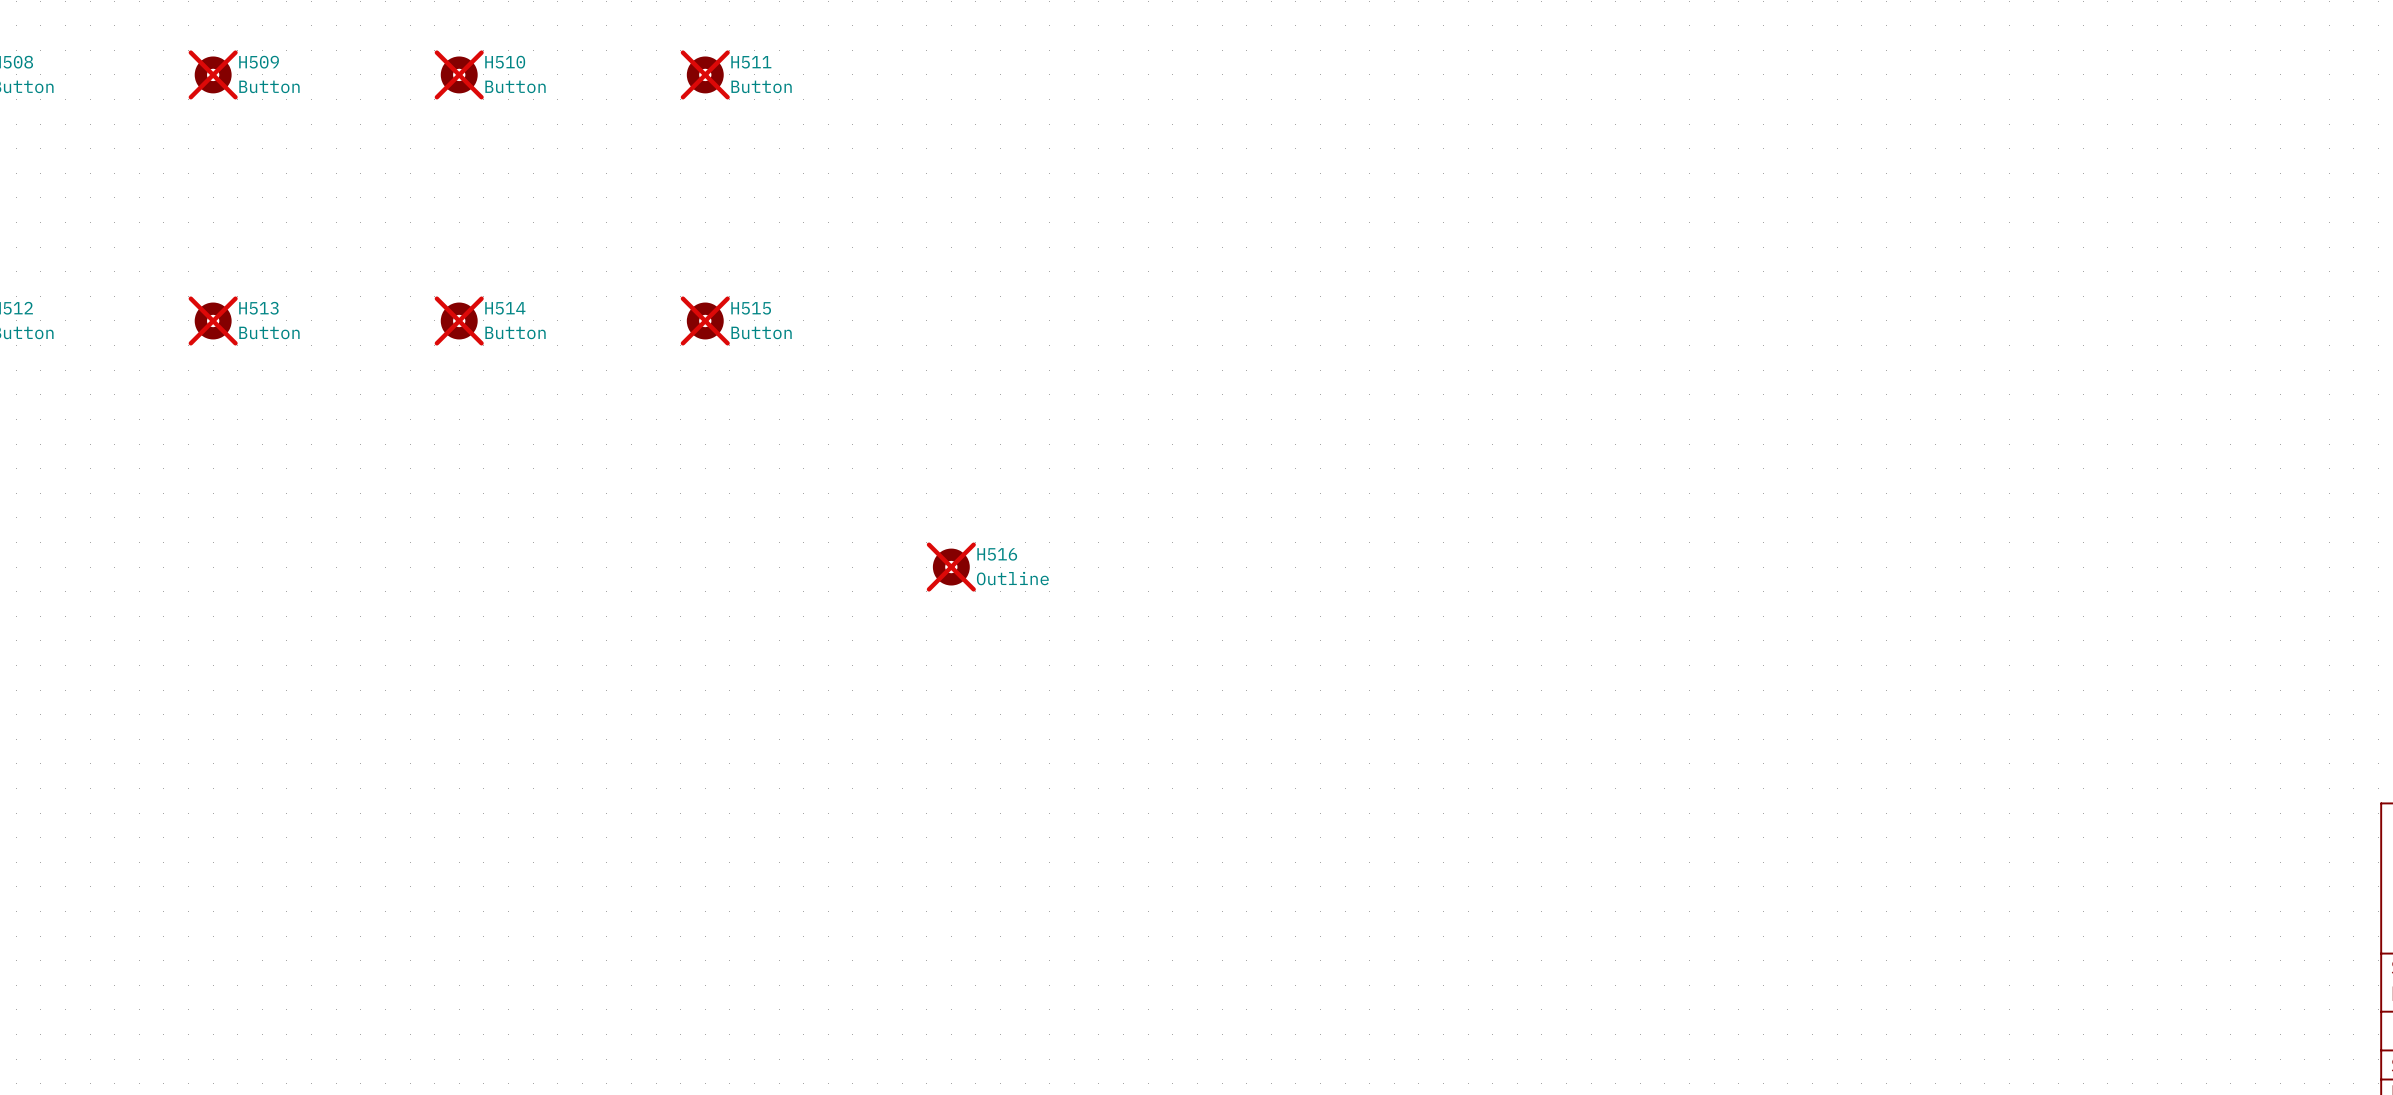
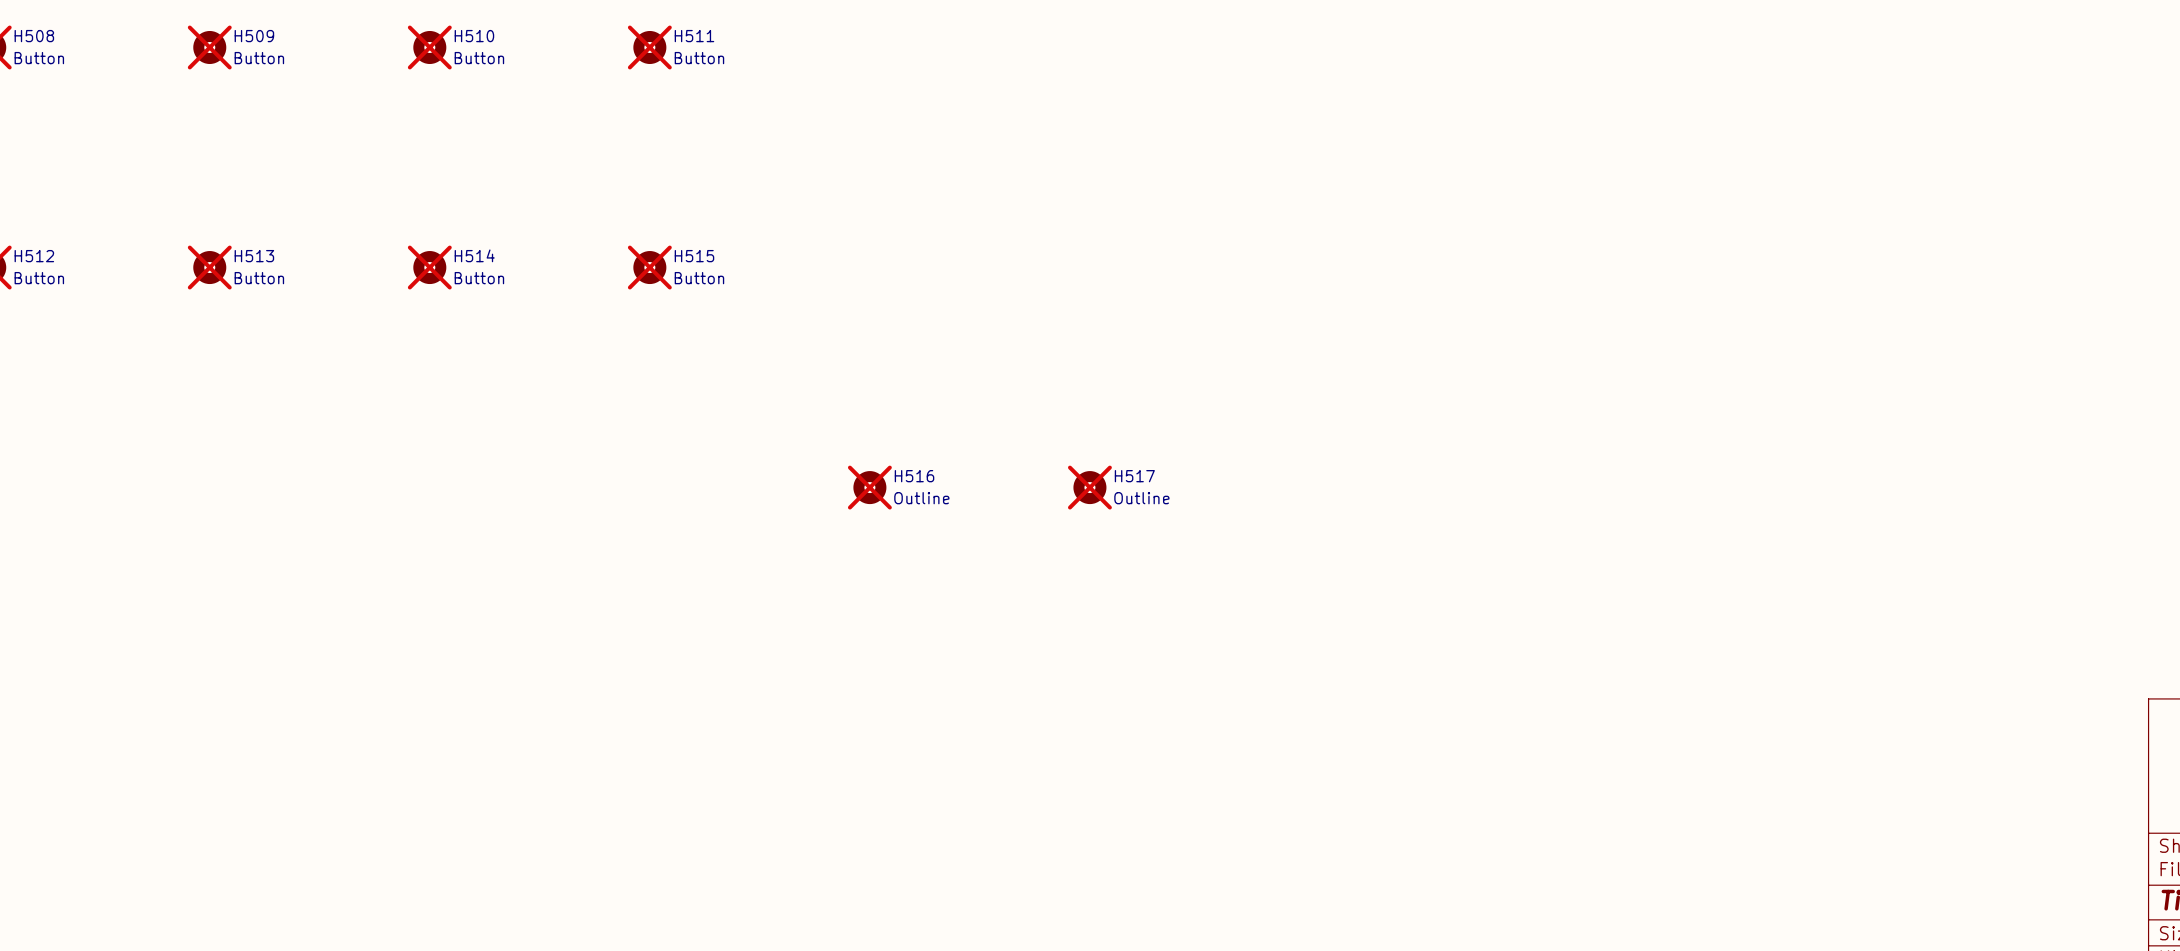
H517: none -> Outline (1089, 487)

